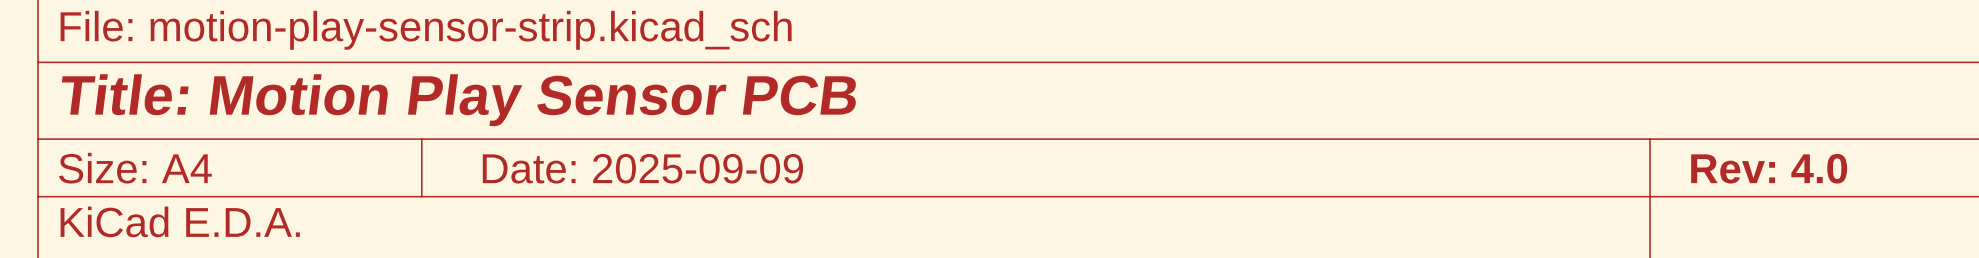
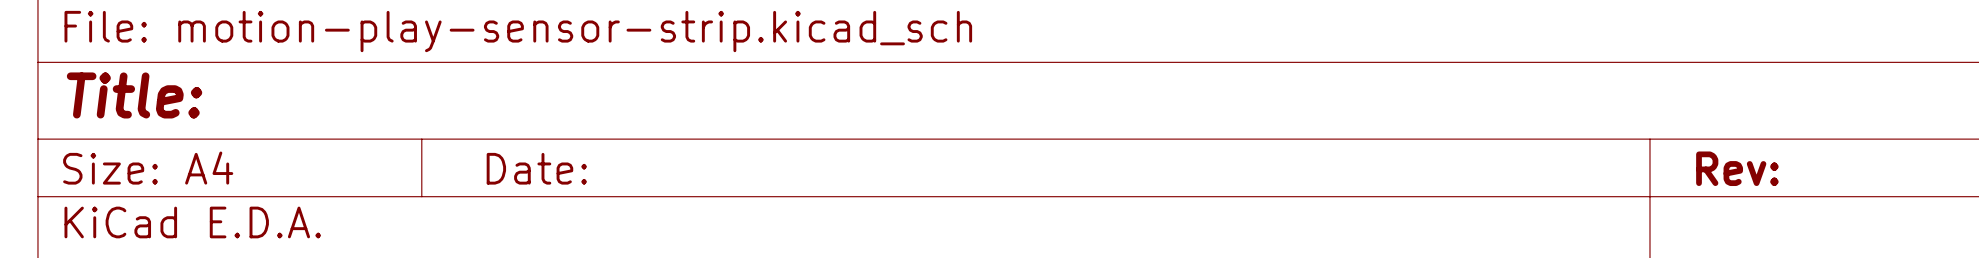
title block: Title: Motion Play Sensor PCB (459, 100) -> Title: (134, 95)
title block: Date: 2025-09-09 (642, 168) -> Date: (536, 168)
title block: Rev: 4.0 (1769, 168) -> Rev: (1737, 168)

